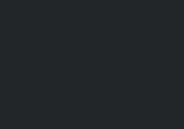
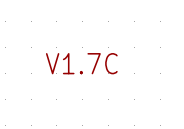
text: none -> V1.7C (81, 63)

